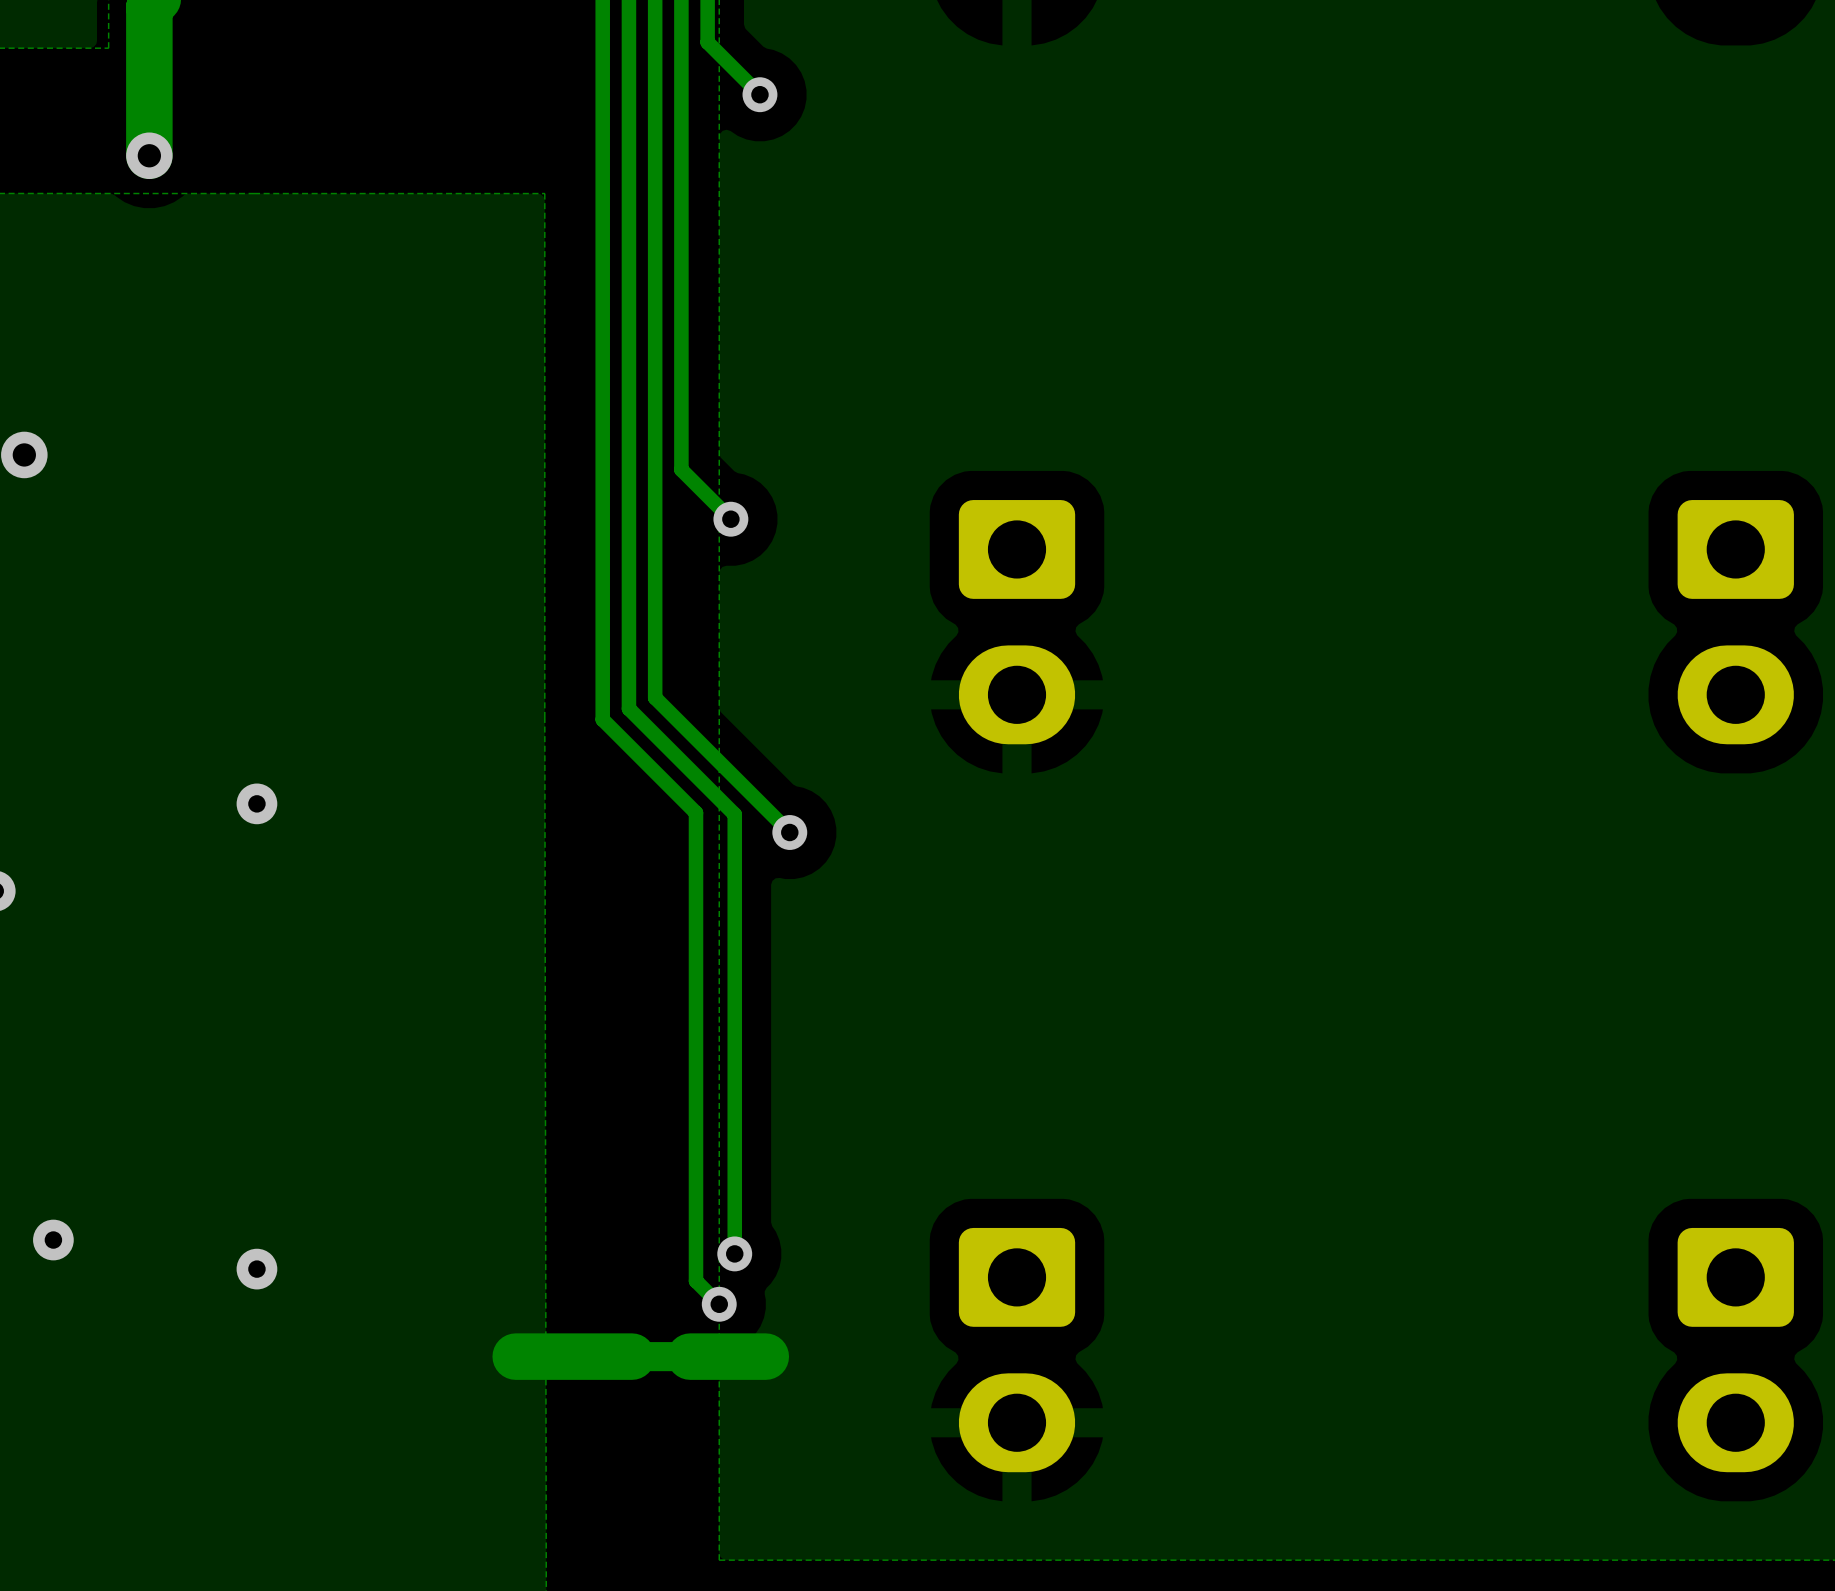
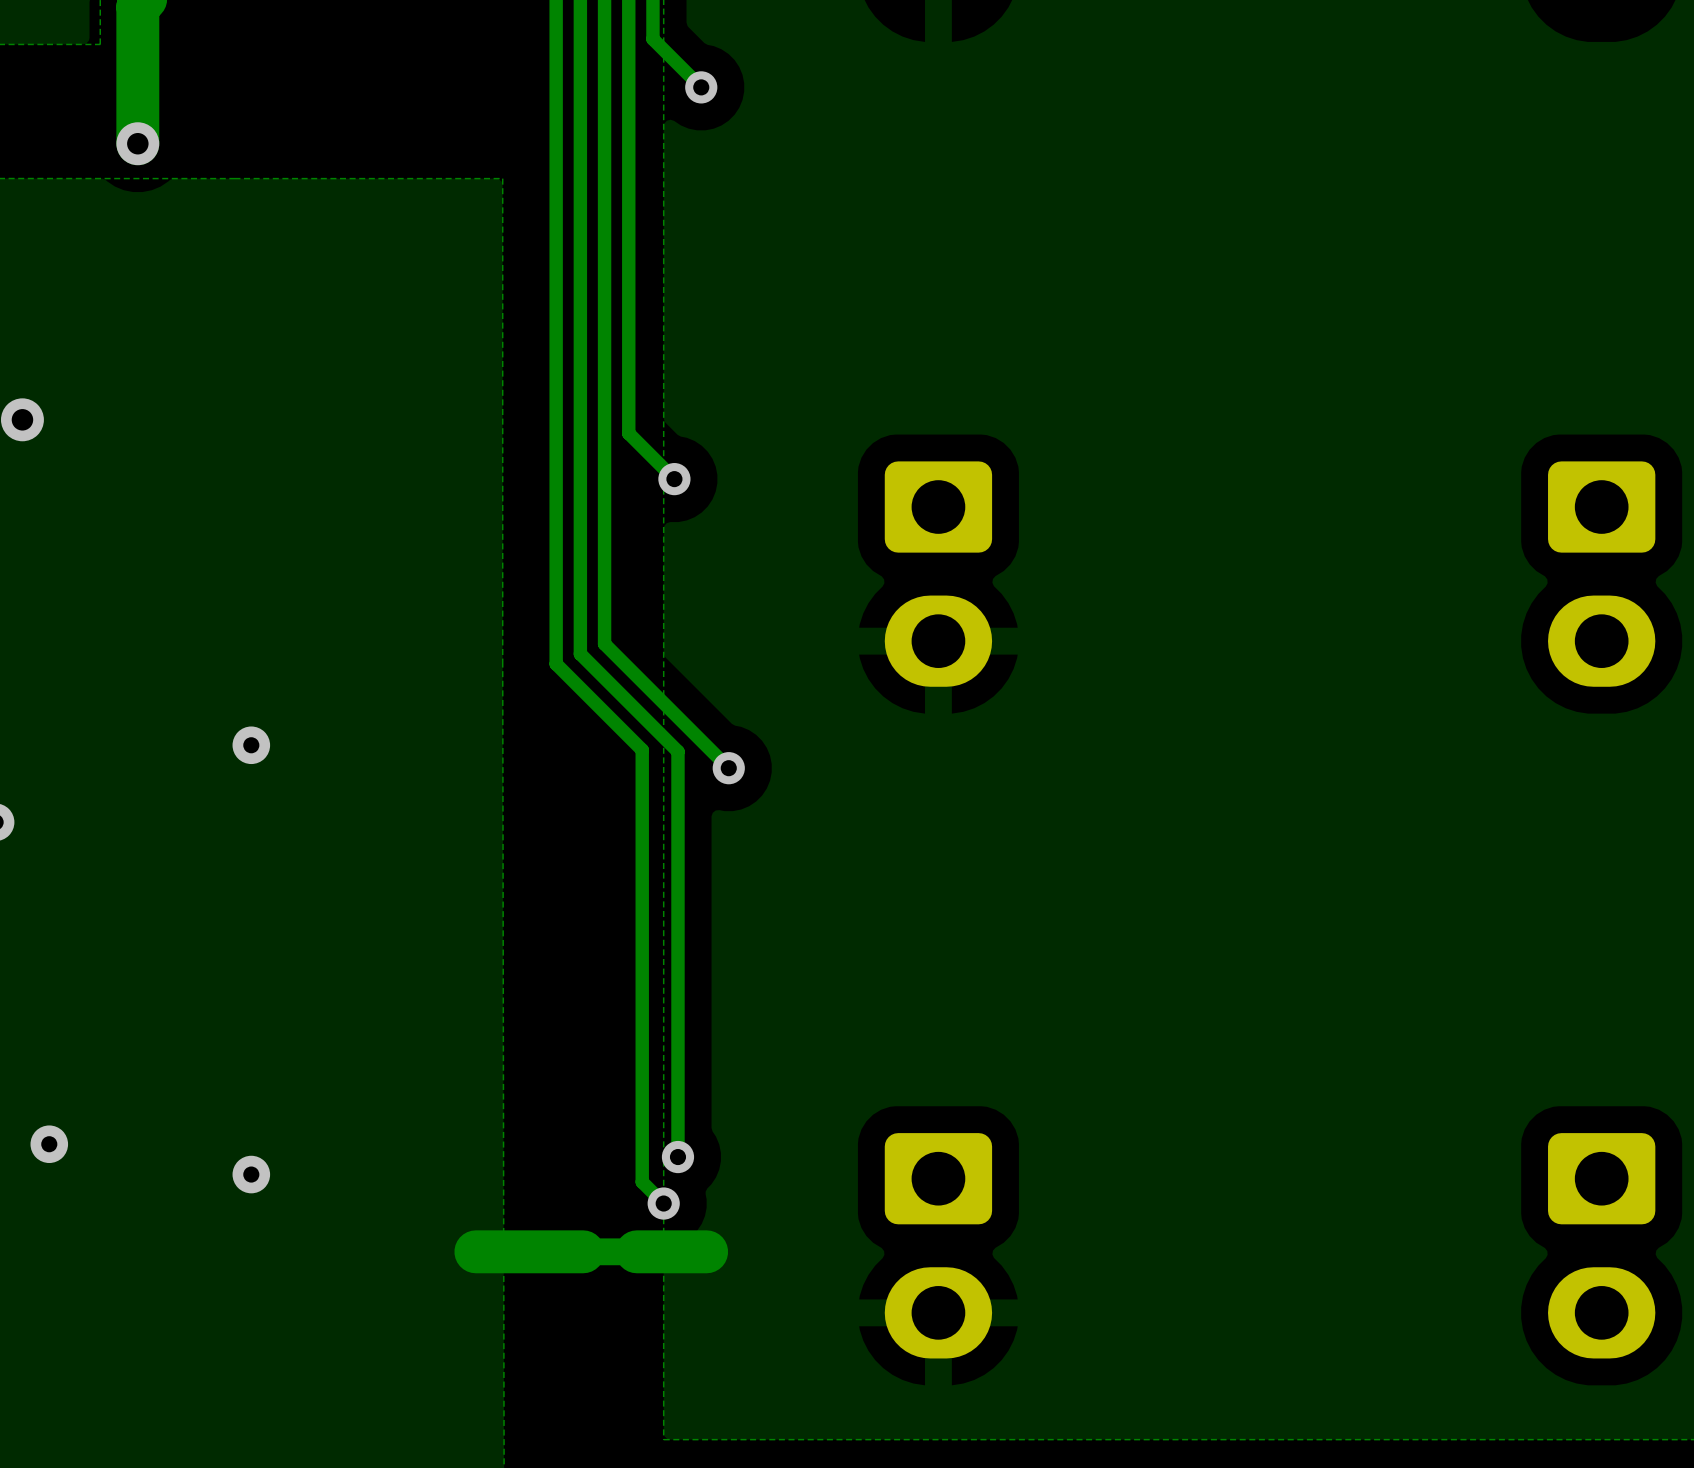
via position: (256, 803) -> (251, 745)
via position: (256, 1269) -> (251, 1174)

